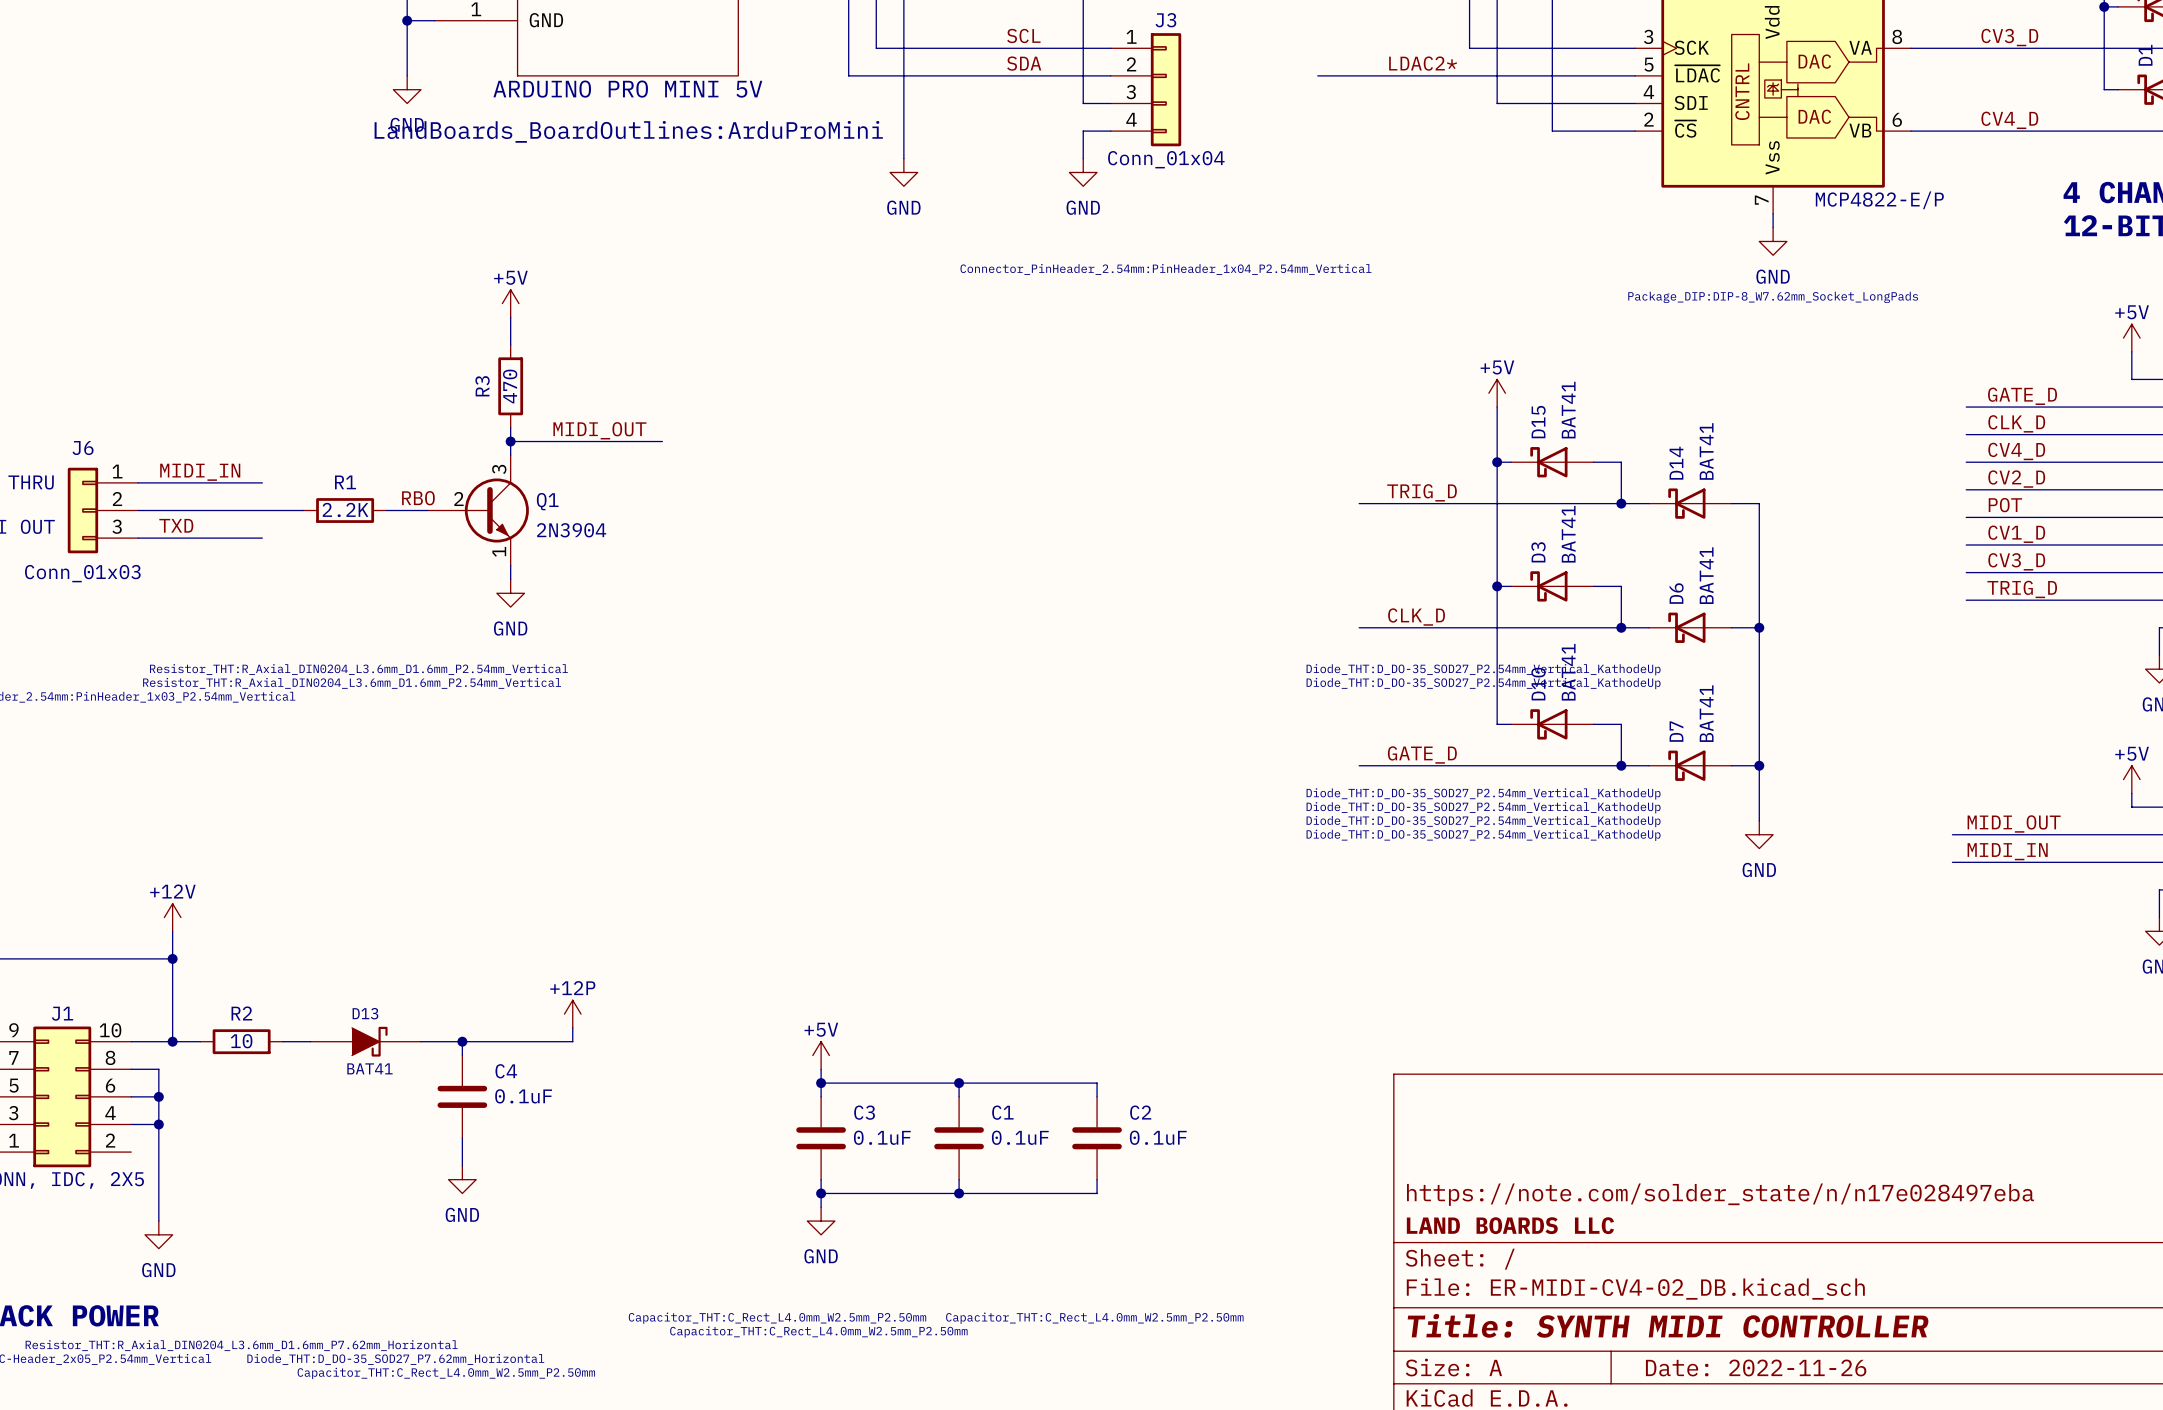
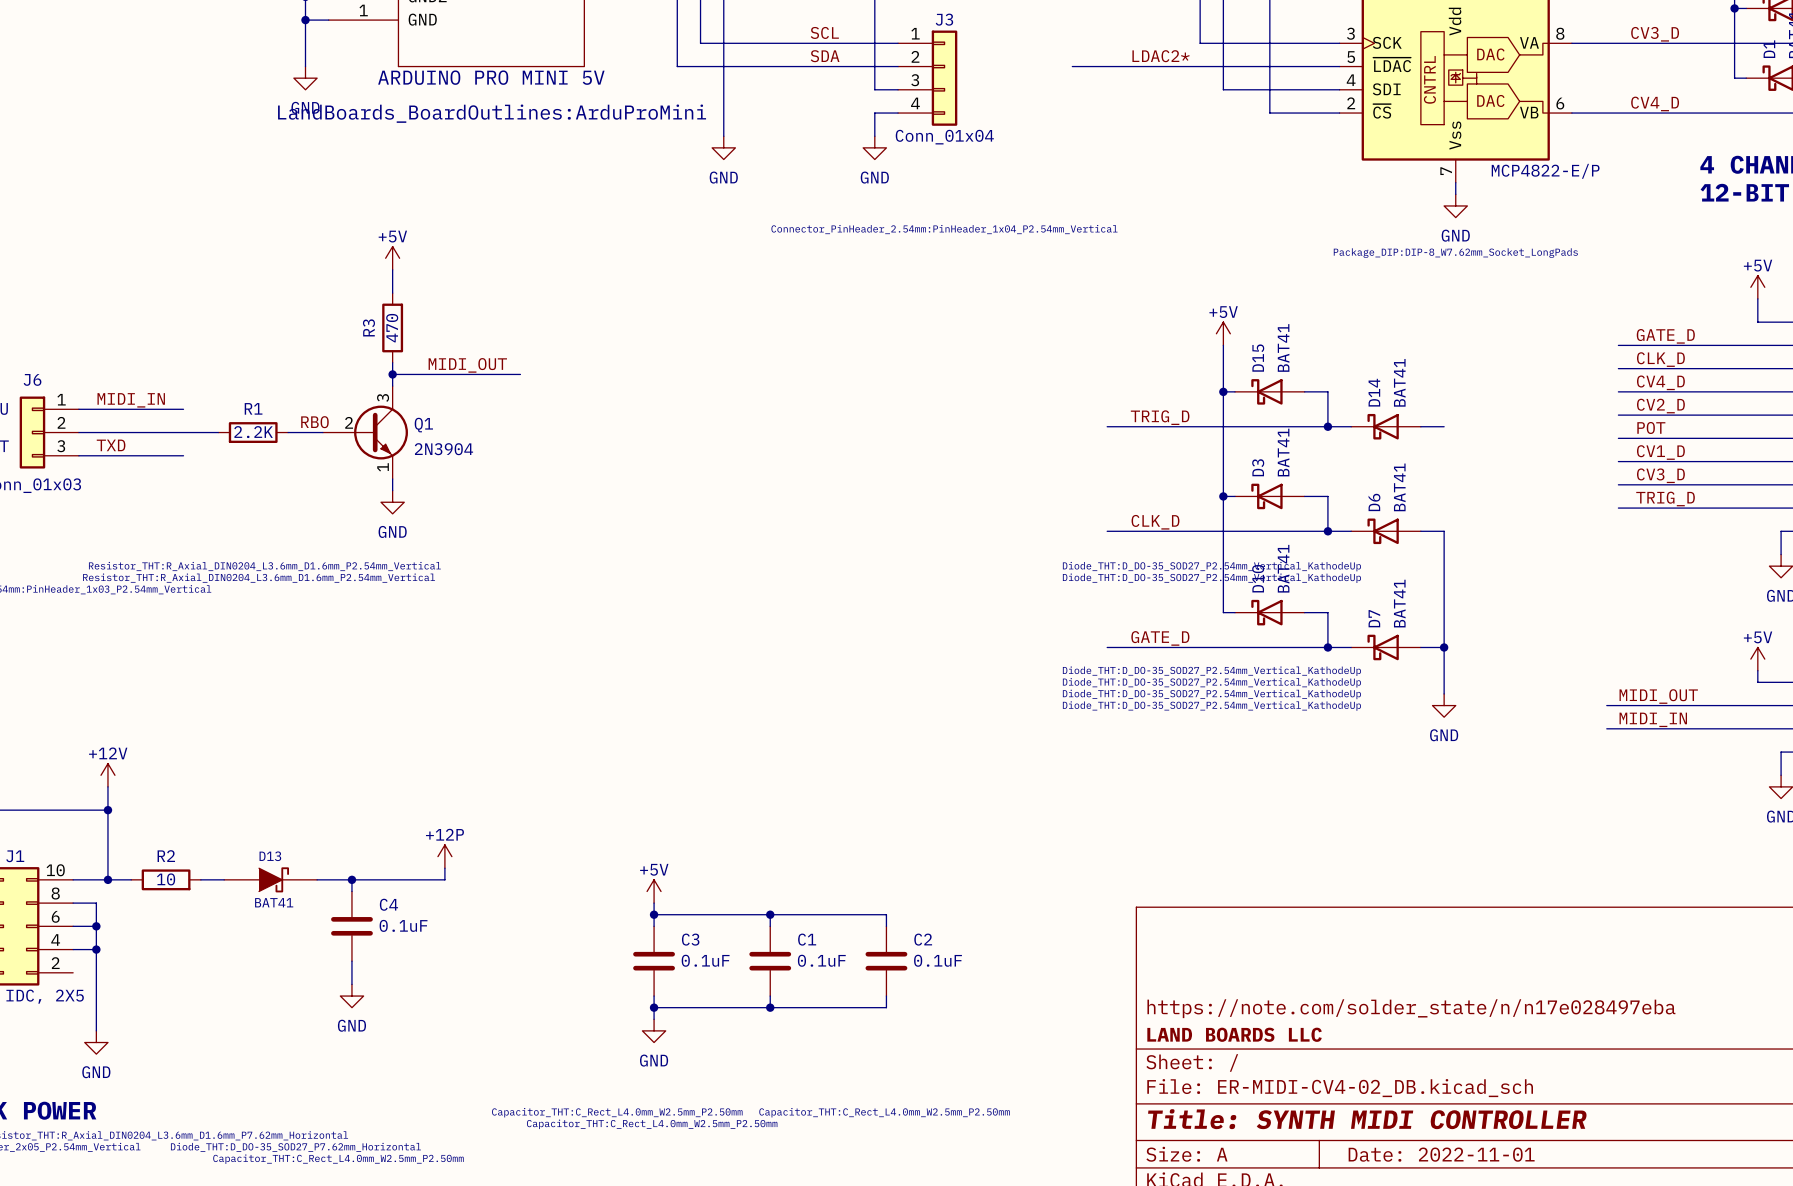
wire: (1759, 503) (1759, 627) -> none
junction: (1759, 627) -> none
title block: Date: 2022-11-26 (1756, 1367) -> Date: 2022-11-01 (1441, 1154)

